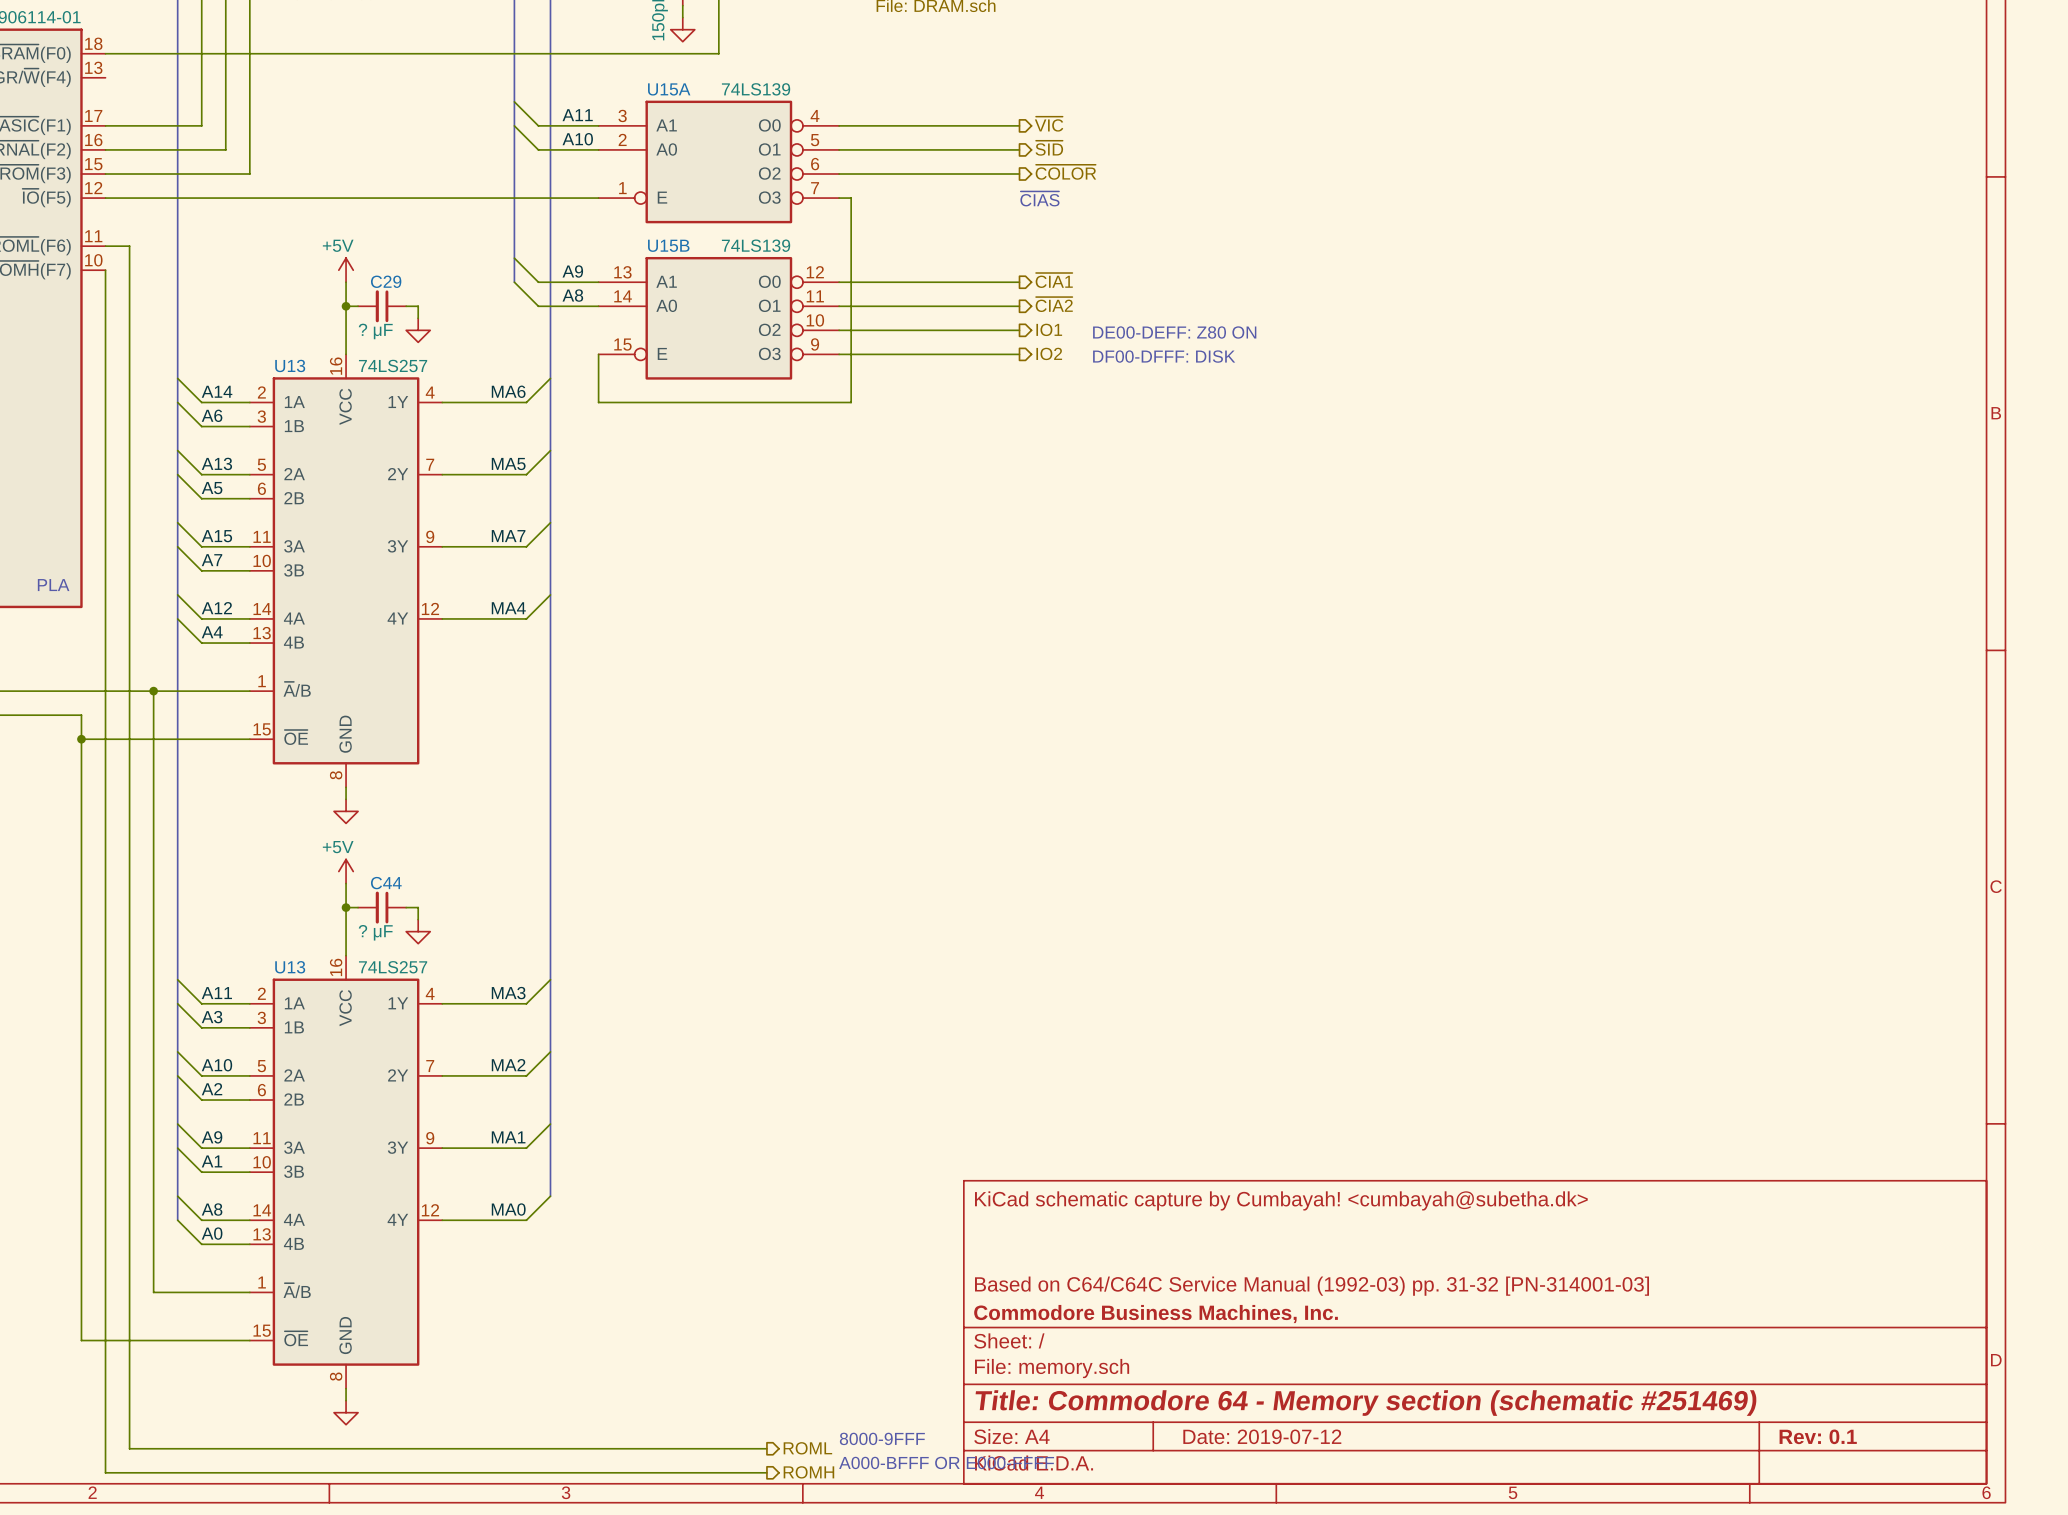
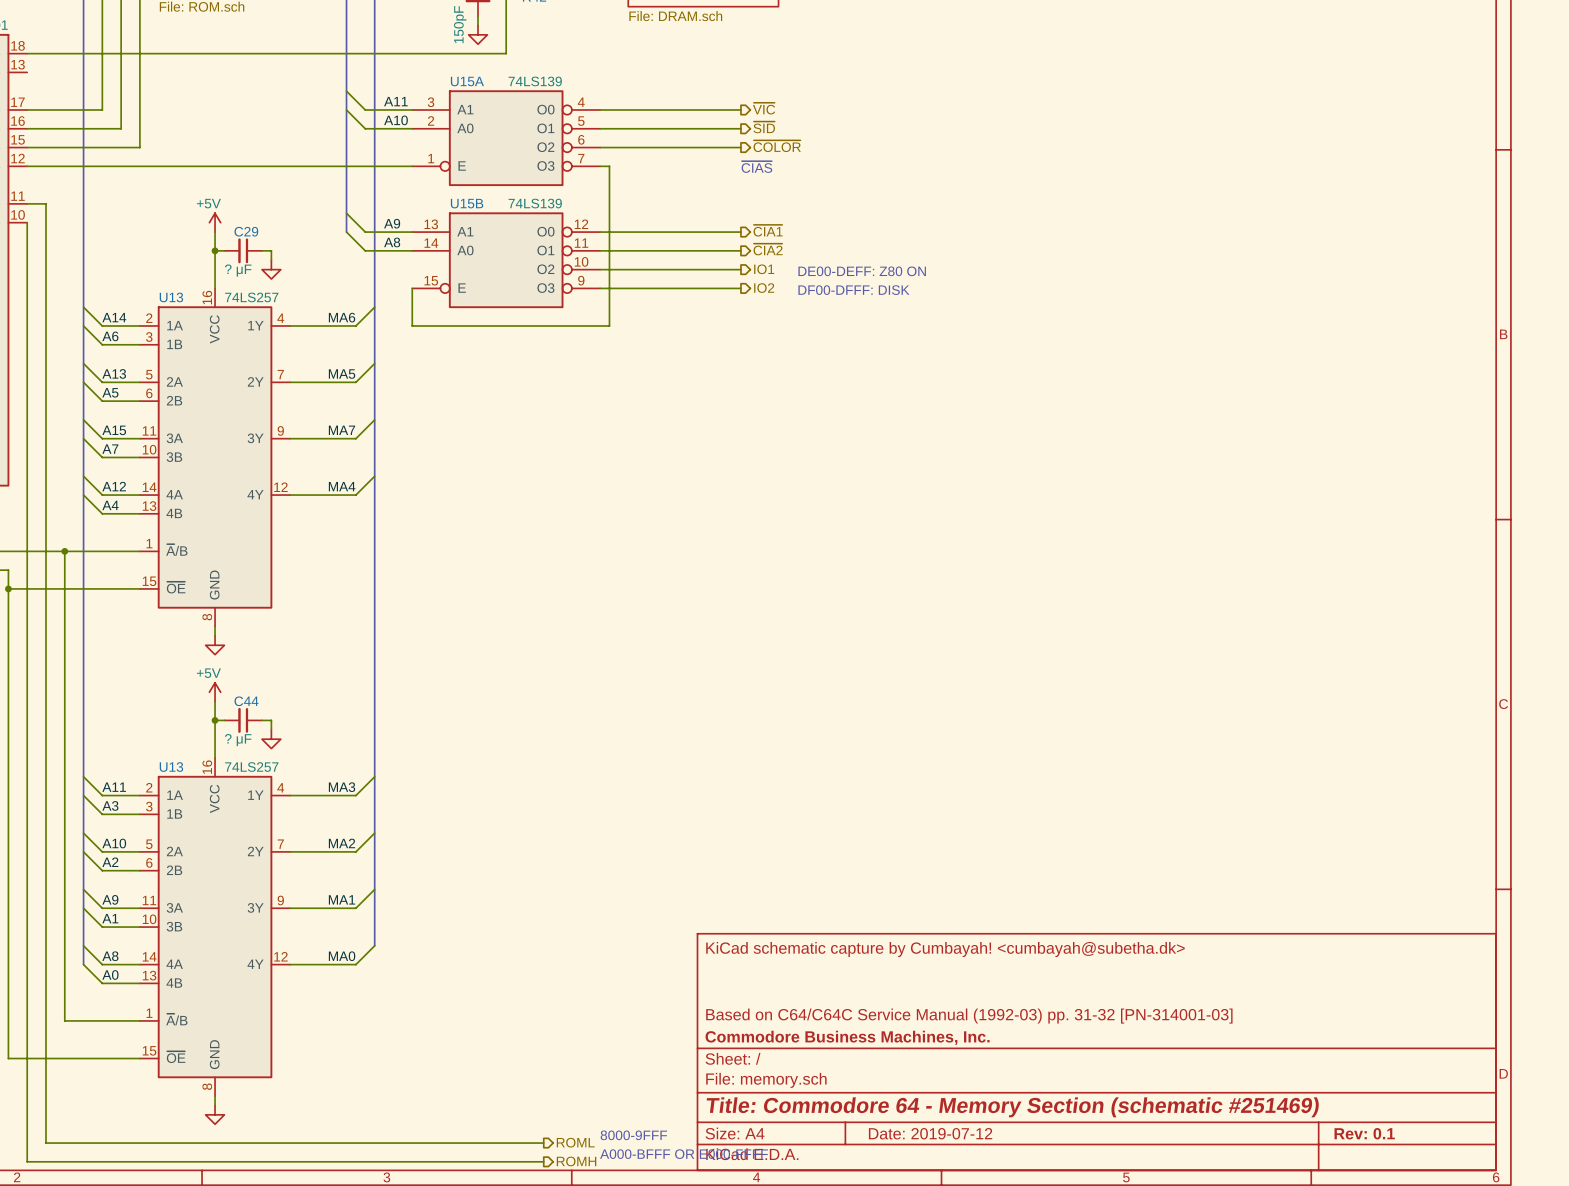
title block: Title: Commodore 64 - Memory section (schematic #251469) (1366, 1403) -> Title: Commodore 64 - Memory Section (schematic #251469) (1012, 1107)

